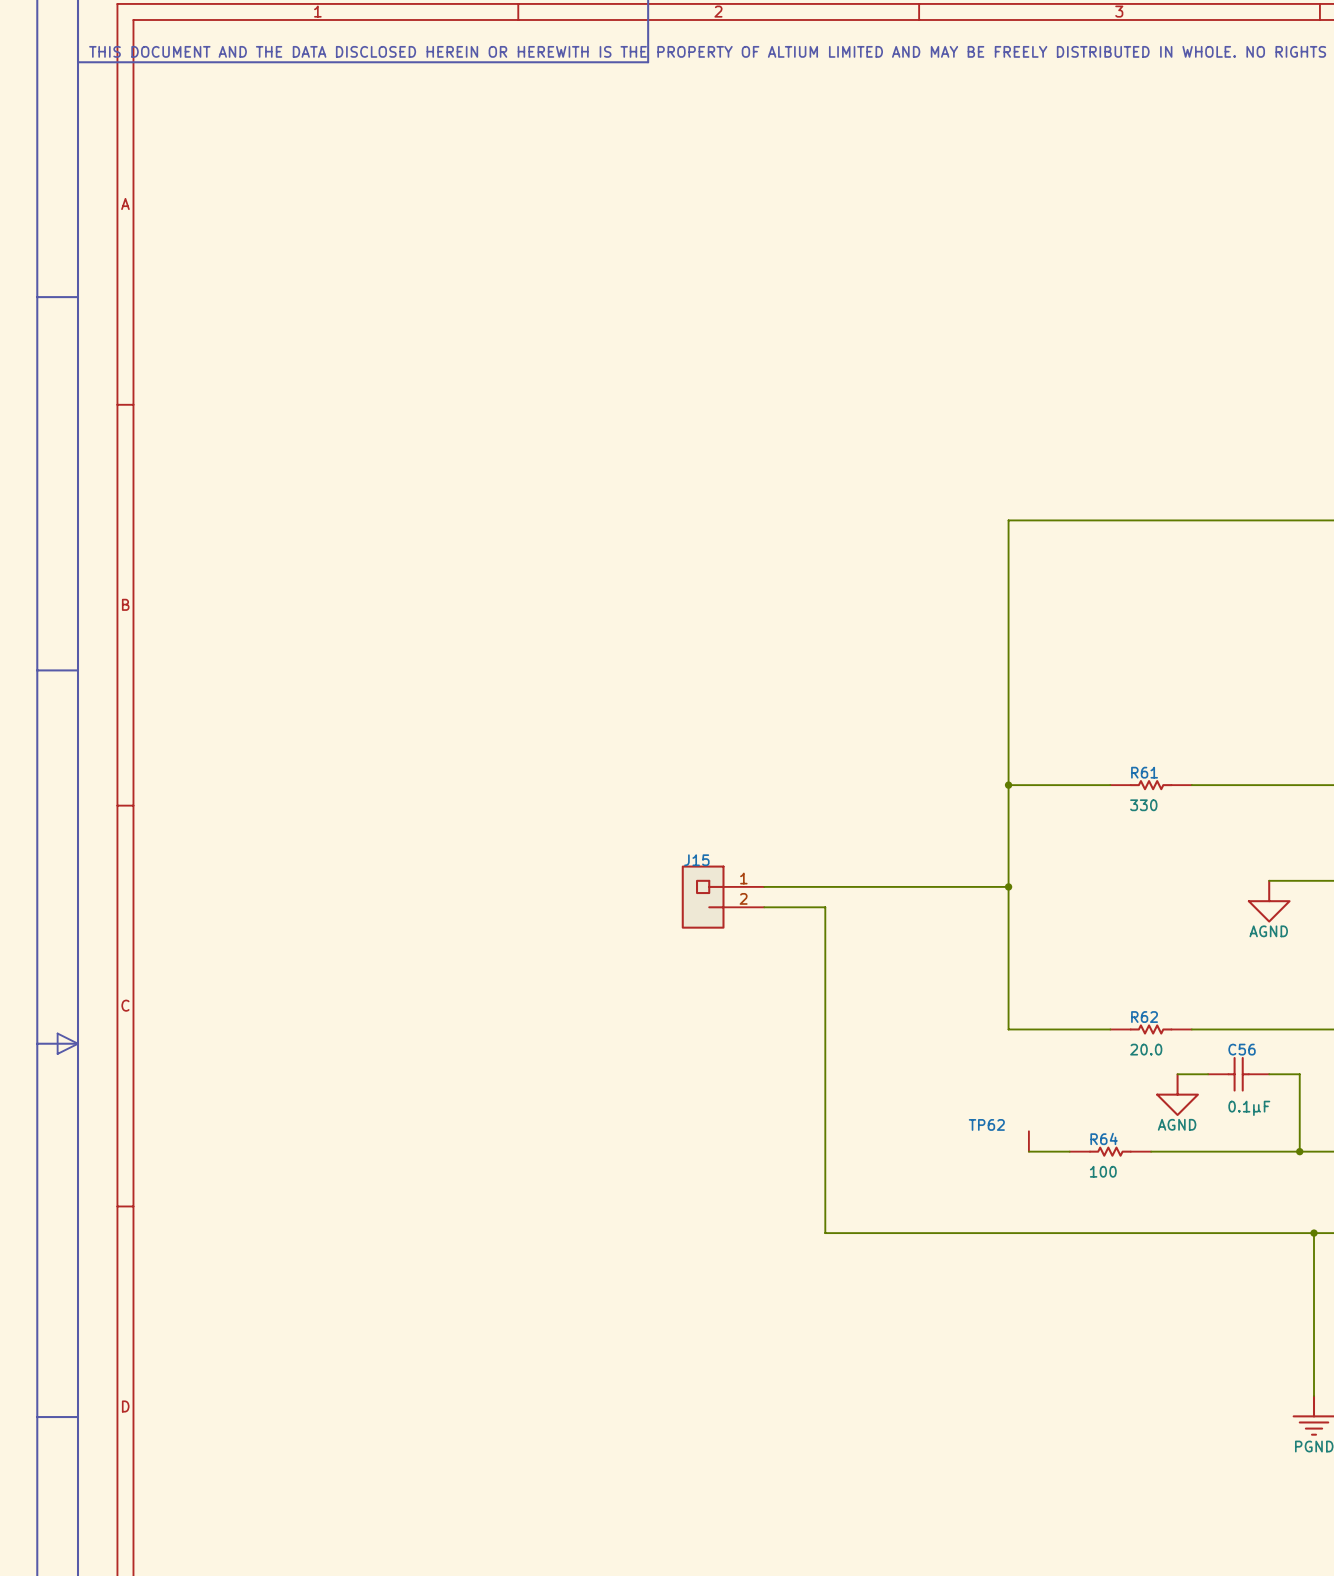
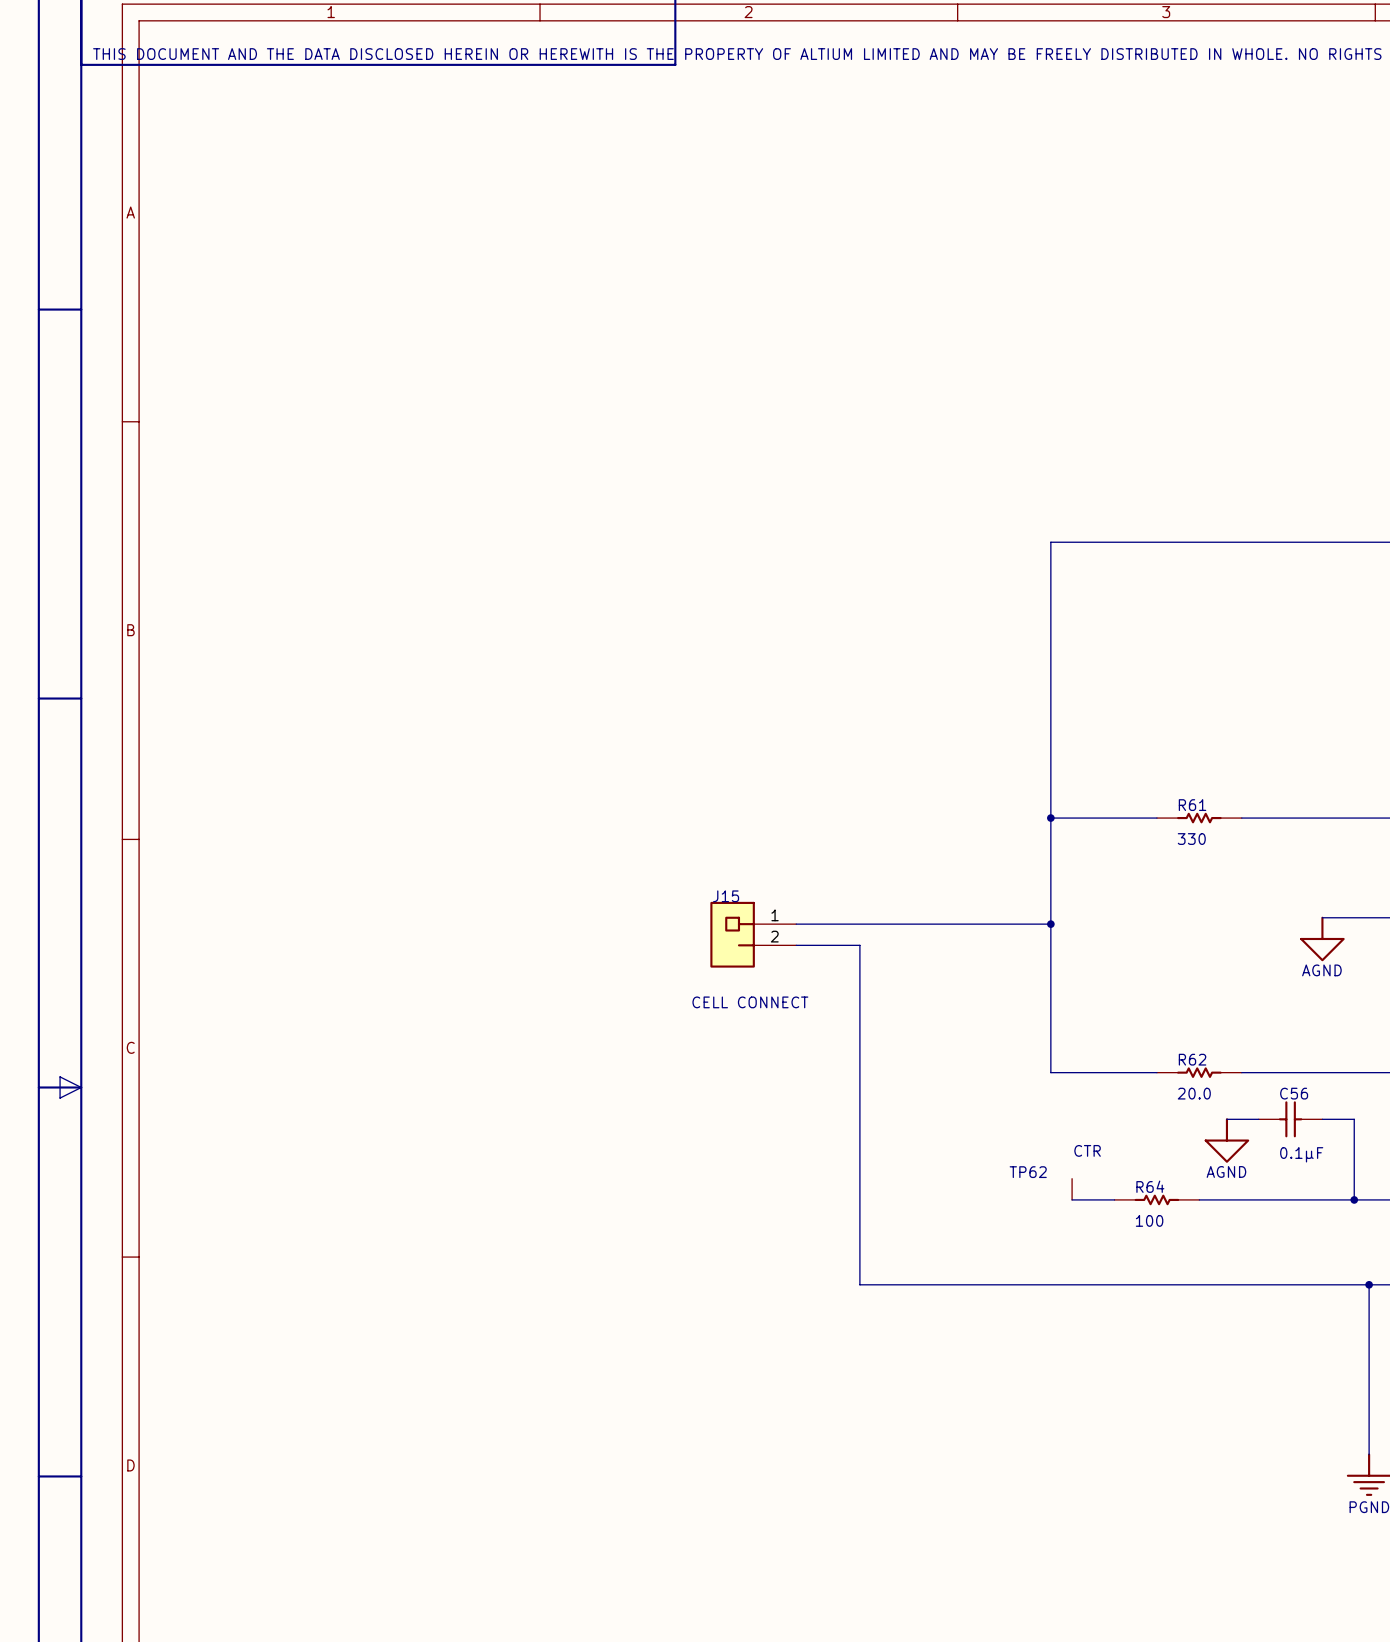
J15 value: none -> CELL CONNECT (750, 1002)
TP62 value: none -> CTR (1087, 1150)

